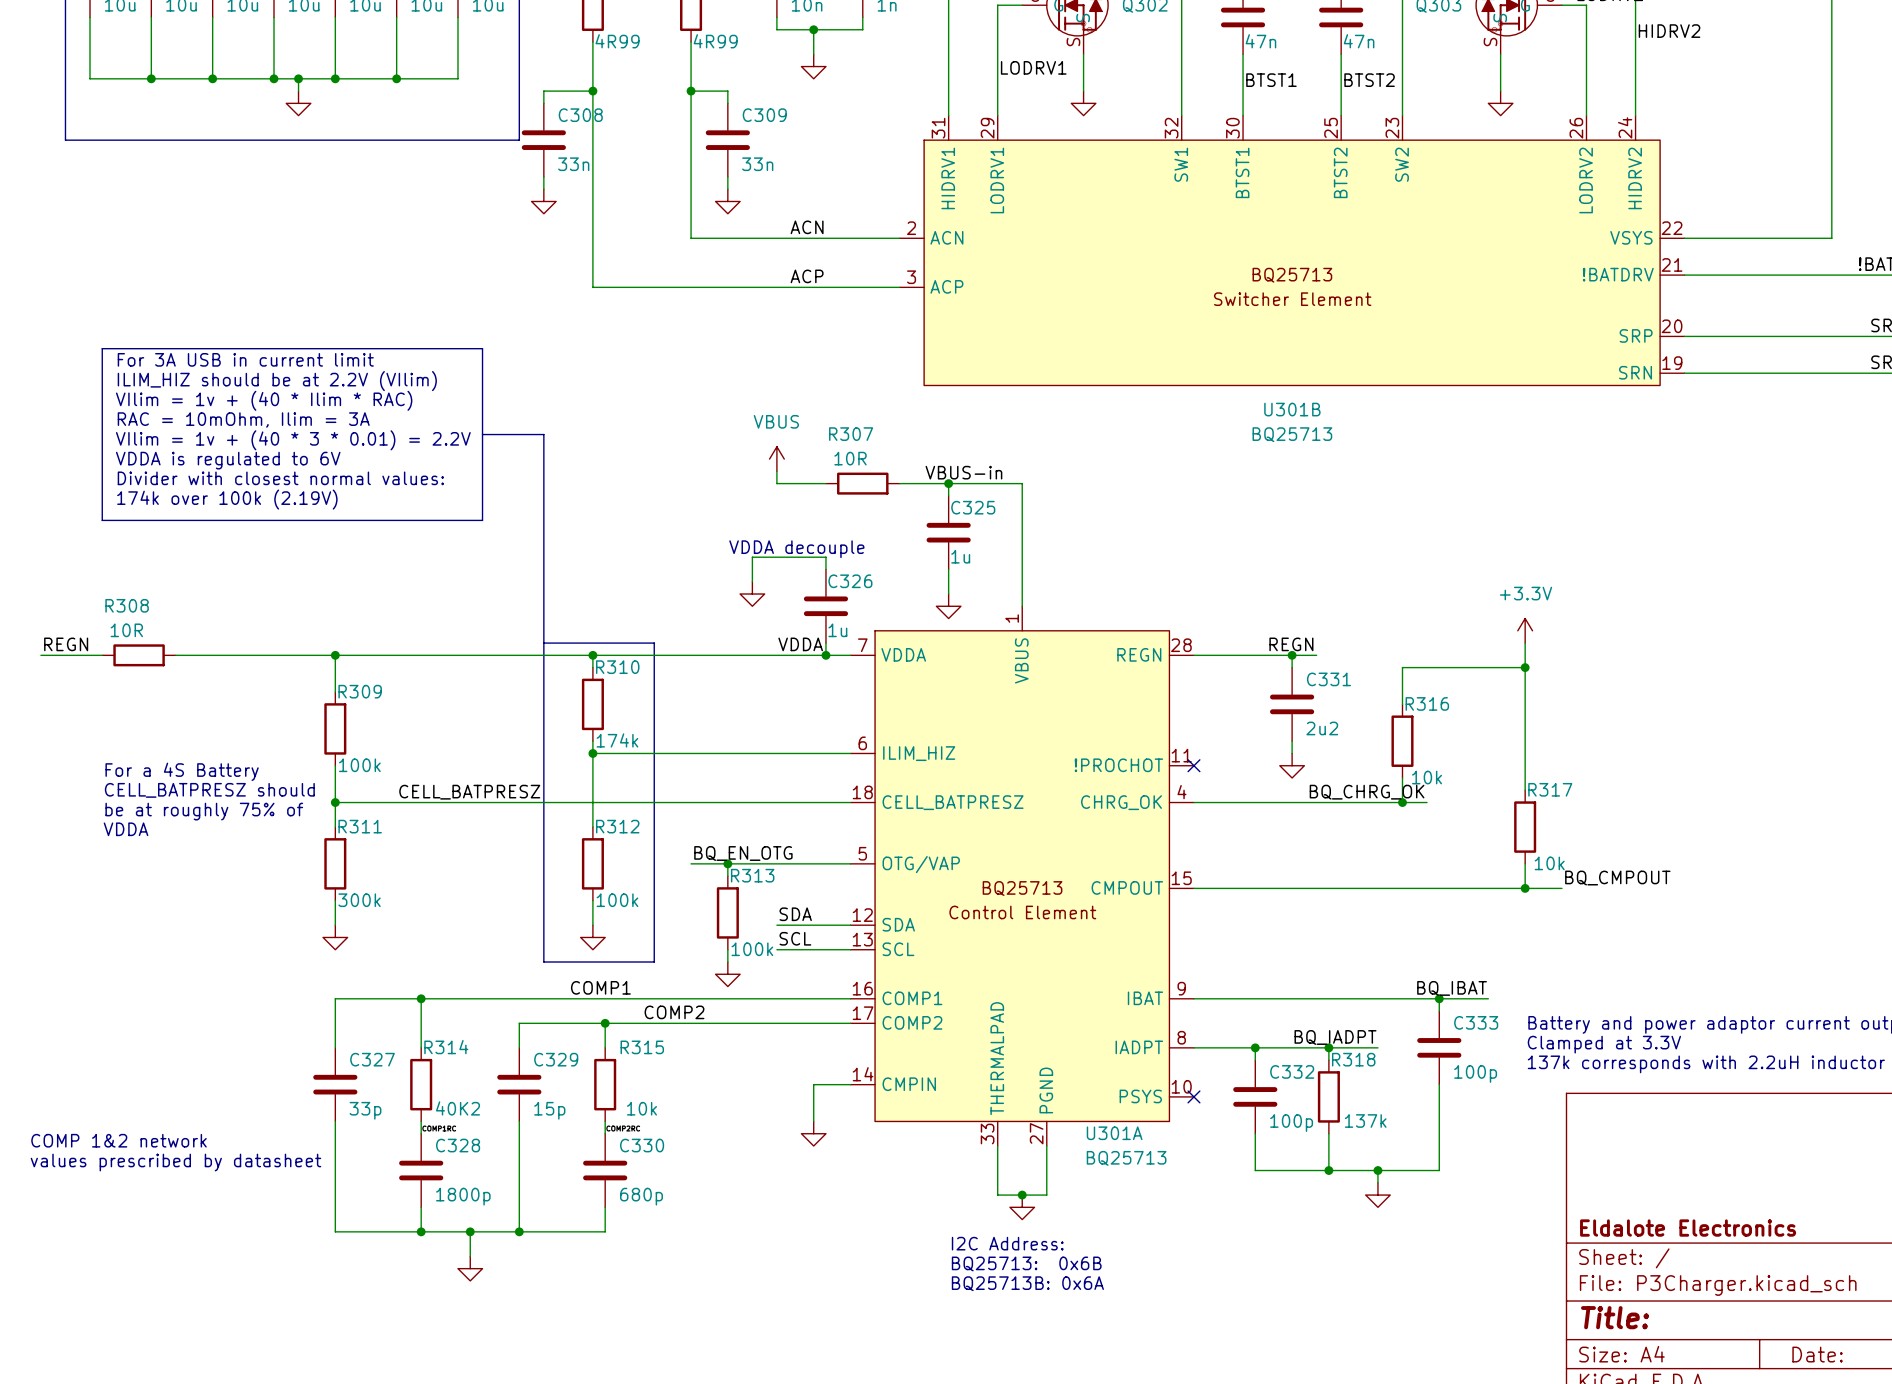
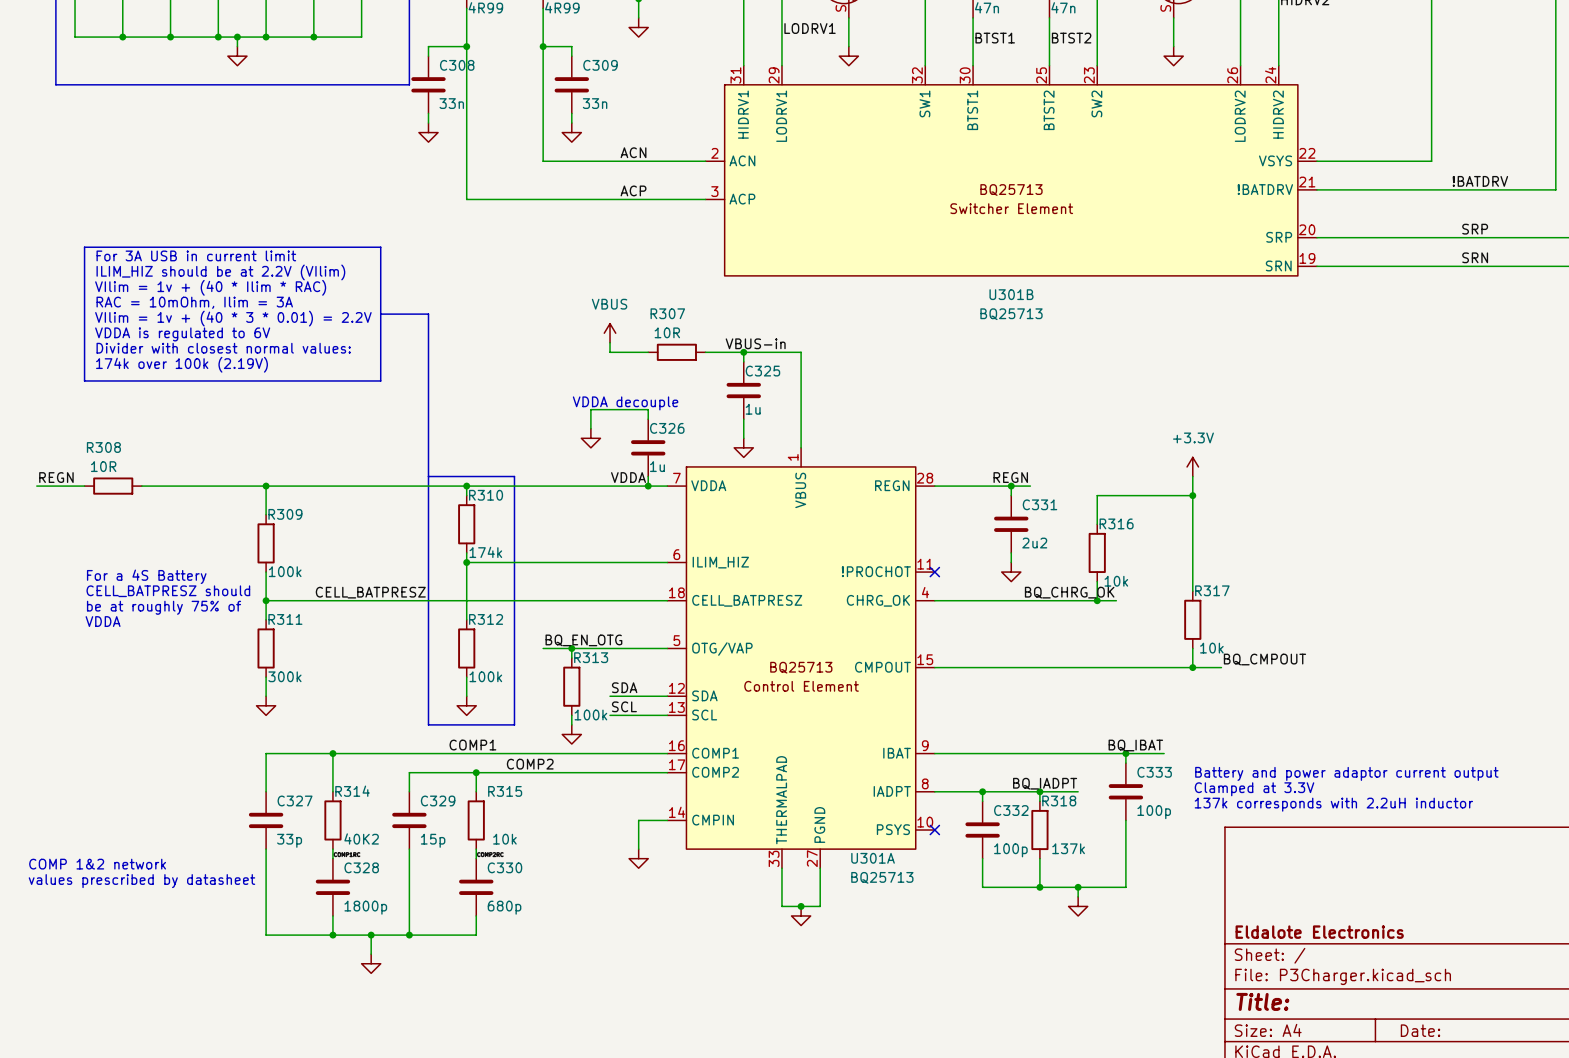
text: I2C Address: (1007, 1243) -> none
text: BQ25713: 0x6B (1026, 1263) -> none
text: BQ25713B: 0x6A (1027, 1283) -> none

